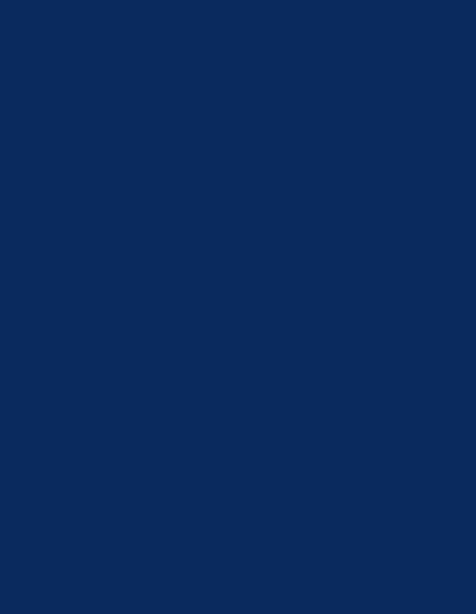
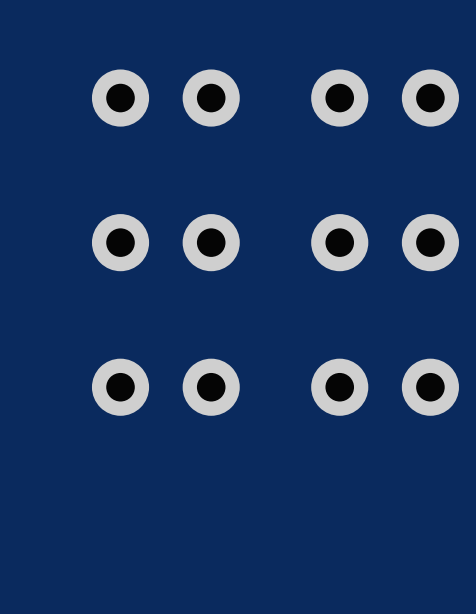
part: none -> (165, 98)
part: none -> (385, 98)
part: none -> (165, 242)
part: none -> (385, 242)
part: none -> (165, 387)
part: none -> (385, 387)

